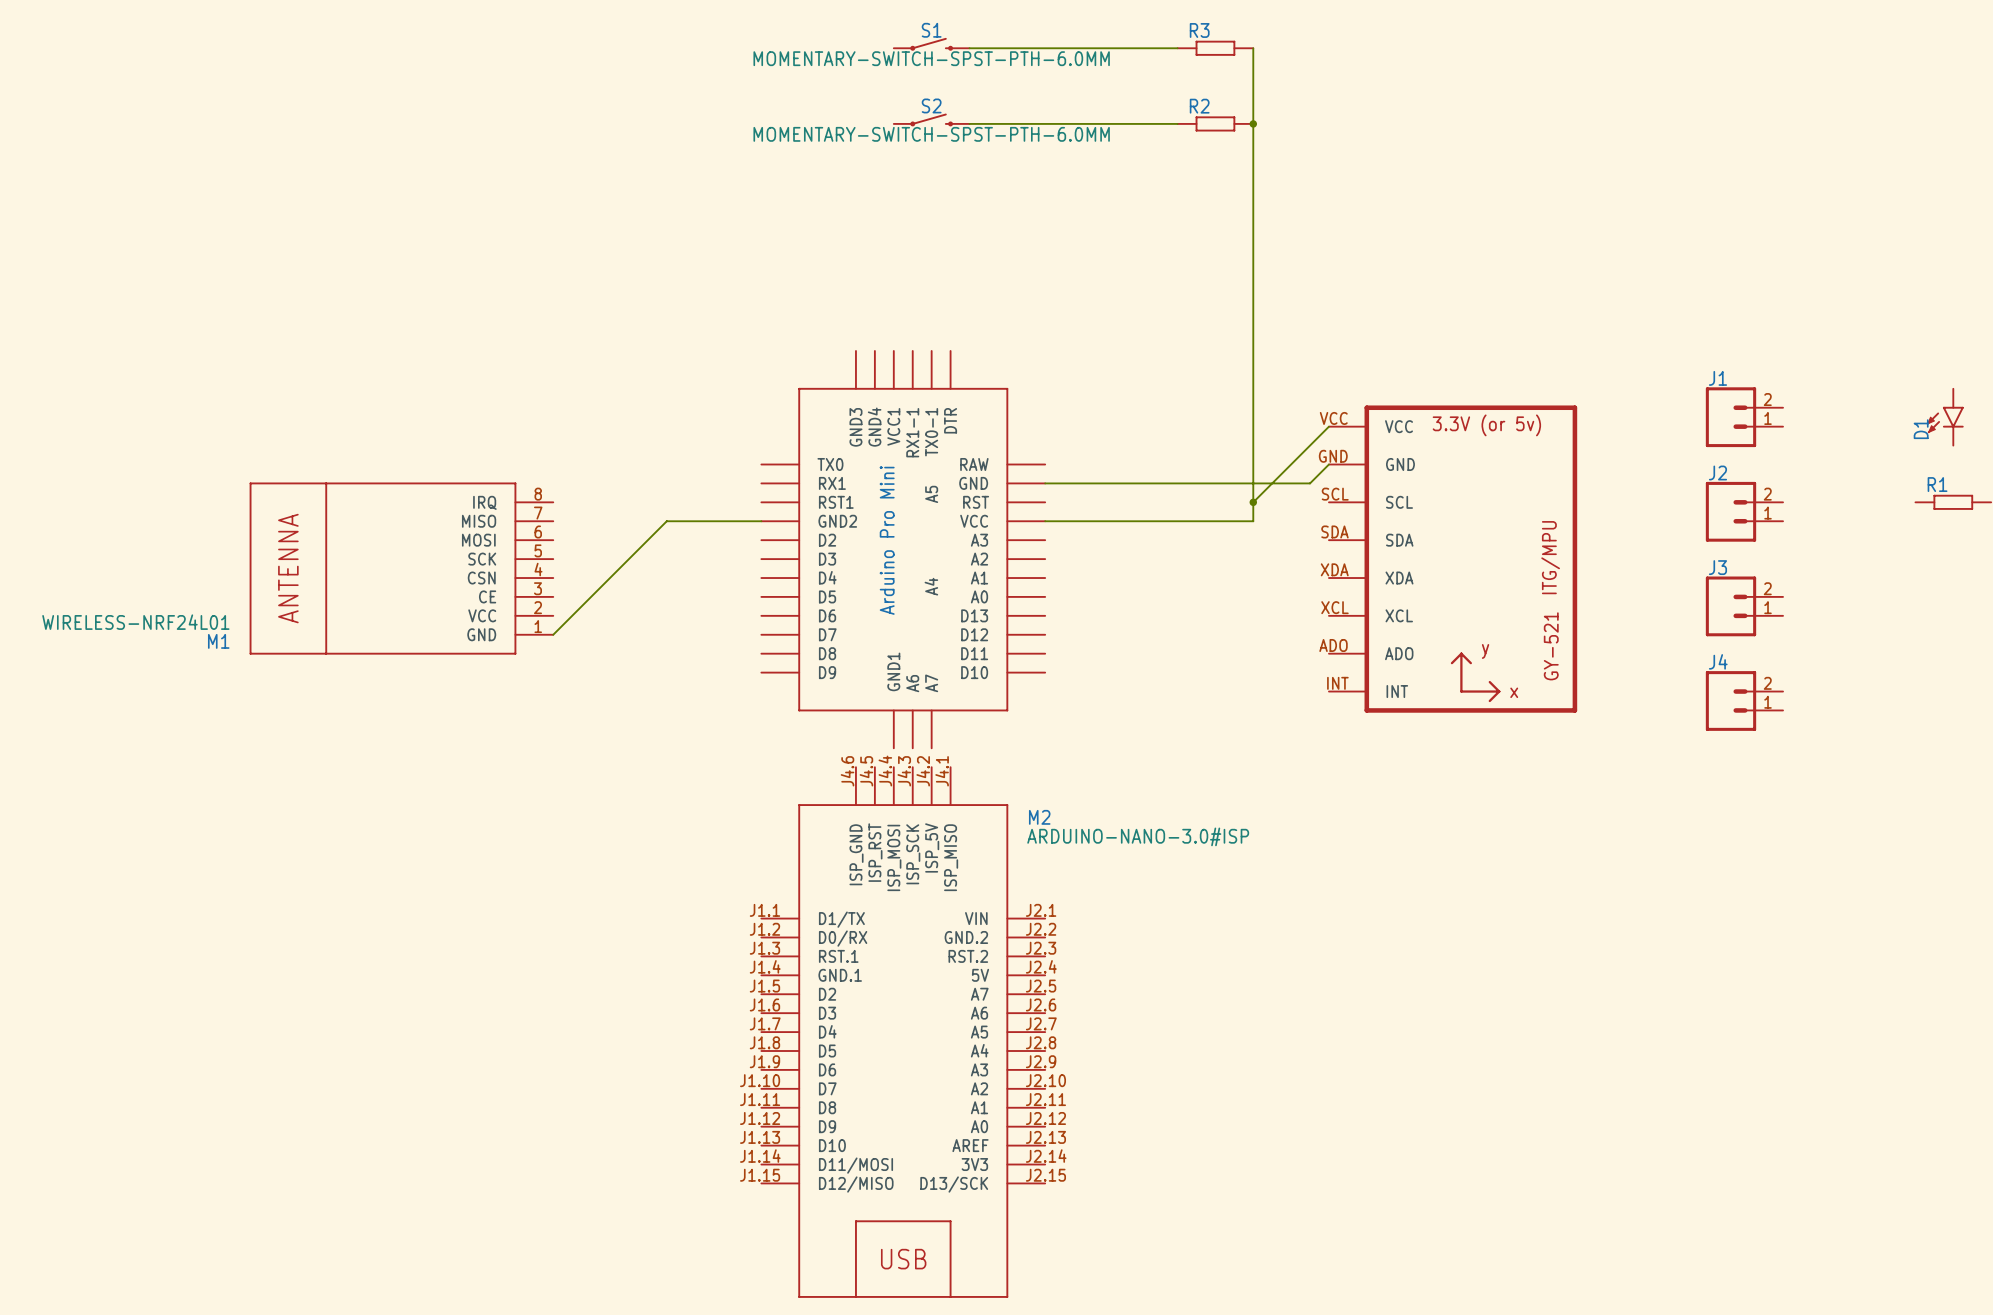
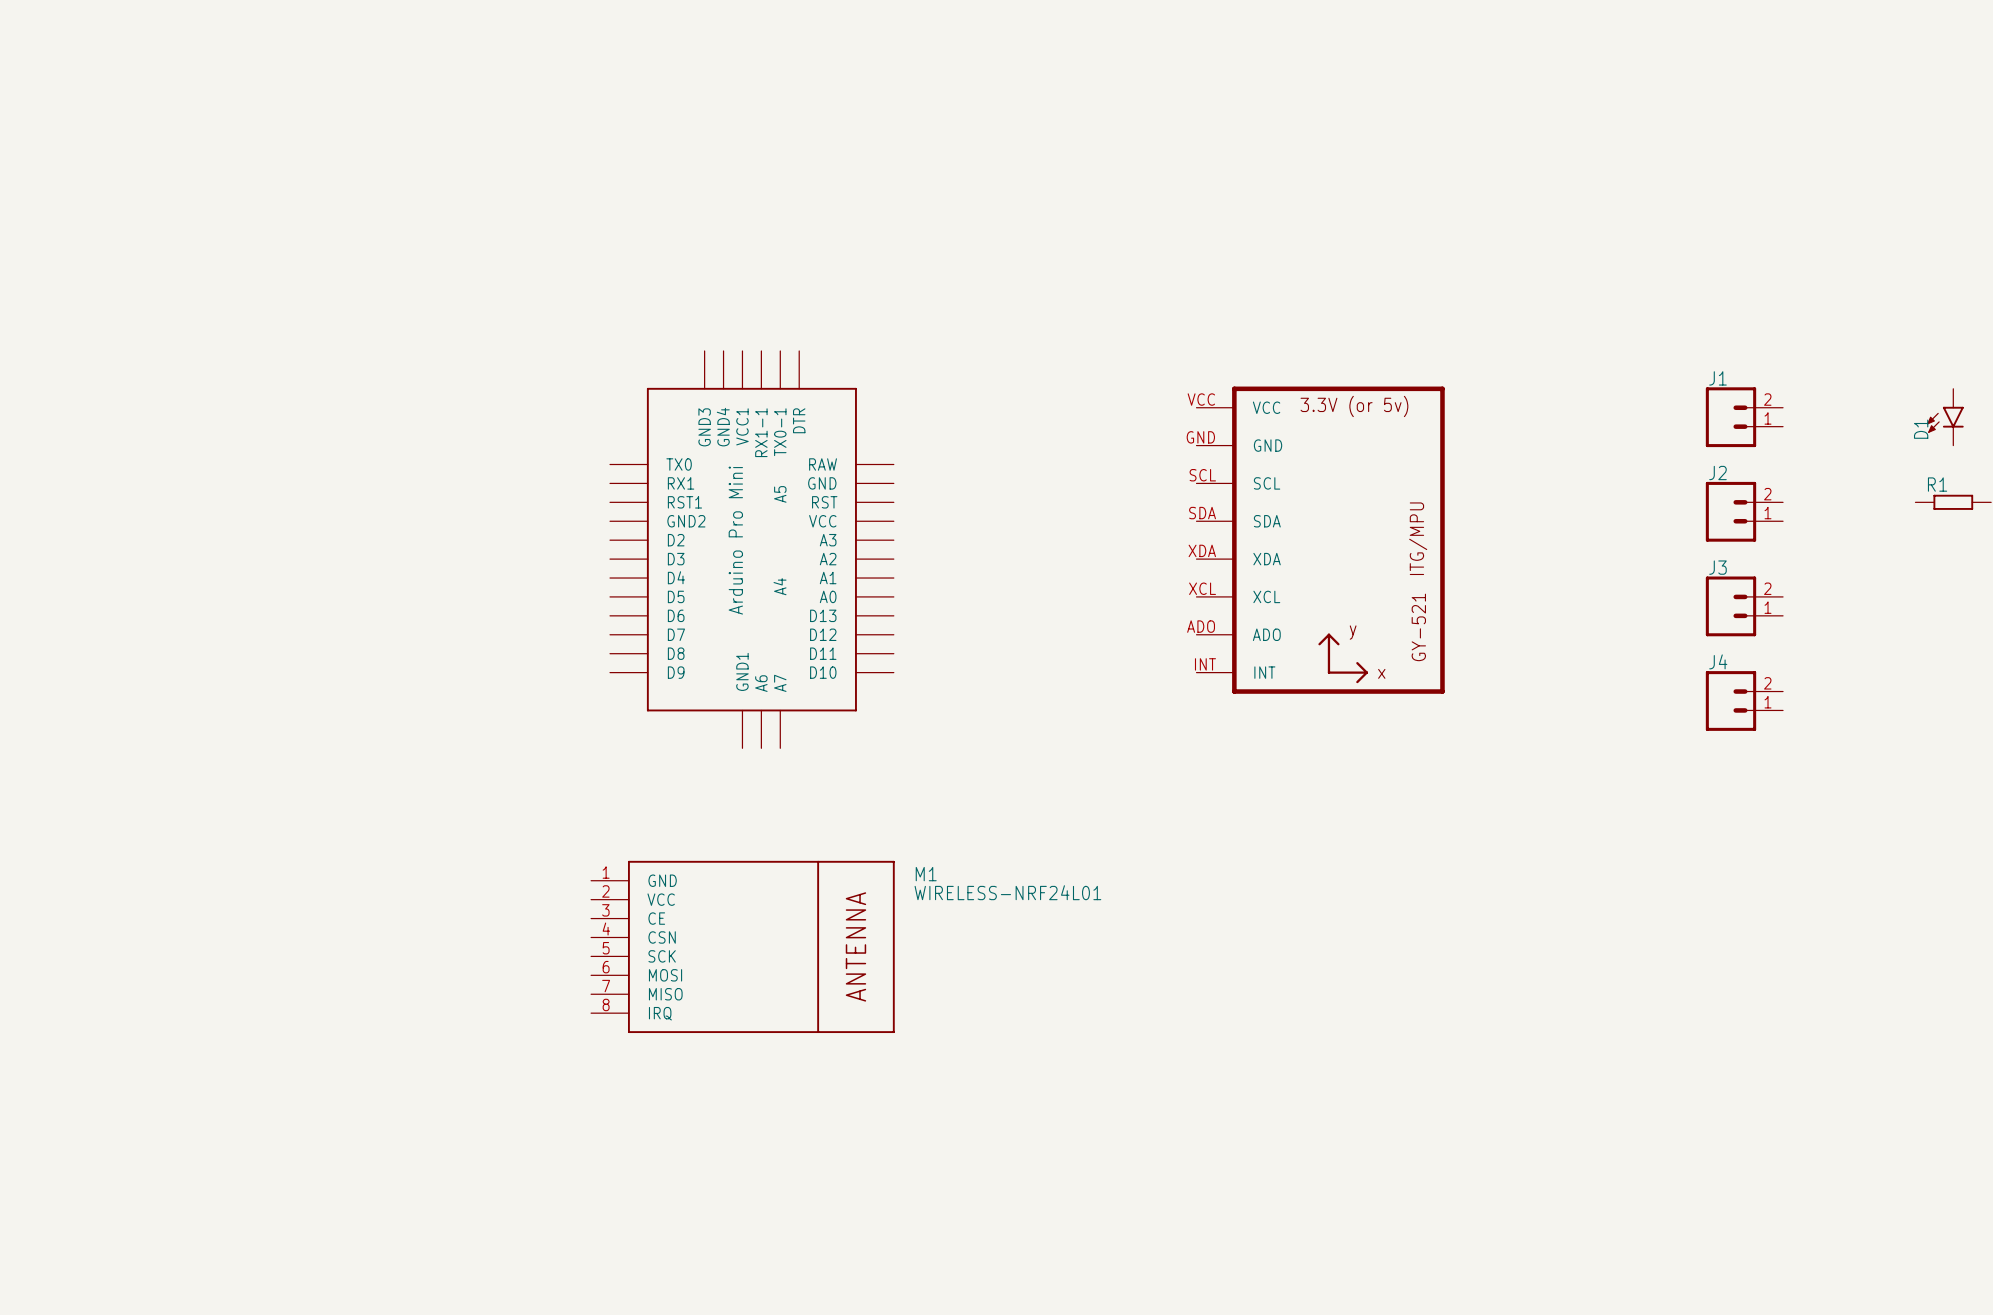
S1: MOMENTARY-SWITCH-SPST-PTH-6.0MM (931, 44) -> none
wire: (969, 48) (1177, 48) -> none
R3: (1215, 48) -> none
wire: (1253, 48) (1253, 521) (1045, 521) -> none
S2: MOMENTARY-SWITCH-SPST-PTH-6.0MM (931, 119) -> none
wire: (969, 123) (1177, 123) -> none
R2: (1215, 123) -> none
junction: (1253, 123) -> none
wire: (1328, 426) (1253, 502) -> none
wire: (1328, 464) (1310, 483) (1045, 483) -> none
M1 symbol: [249, 482, 554, 655] -> [591, 860, 895, 1034]
junction: (1253, 502) -> none
wire: (761, 521) (666, 521) (553, 634) -> none
part position: (903, 549) -> (751, 549)
part position: (1453, 559) -> (1320, 540)
M1 value position: WIRELESS-NRF24L01 (135, 622) -> WIRELESS-NRF24L01 (1007, 892)
M1 name position: M1 (218, 641) -> M1 (926, 874)
M2: ARDUINO-NANO-3.0#ISP (903, 1032) -> none

